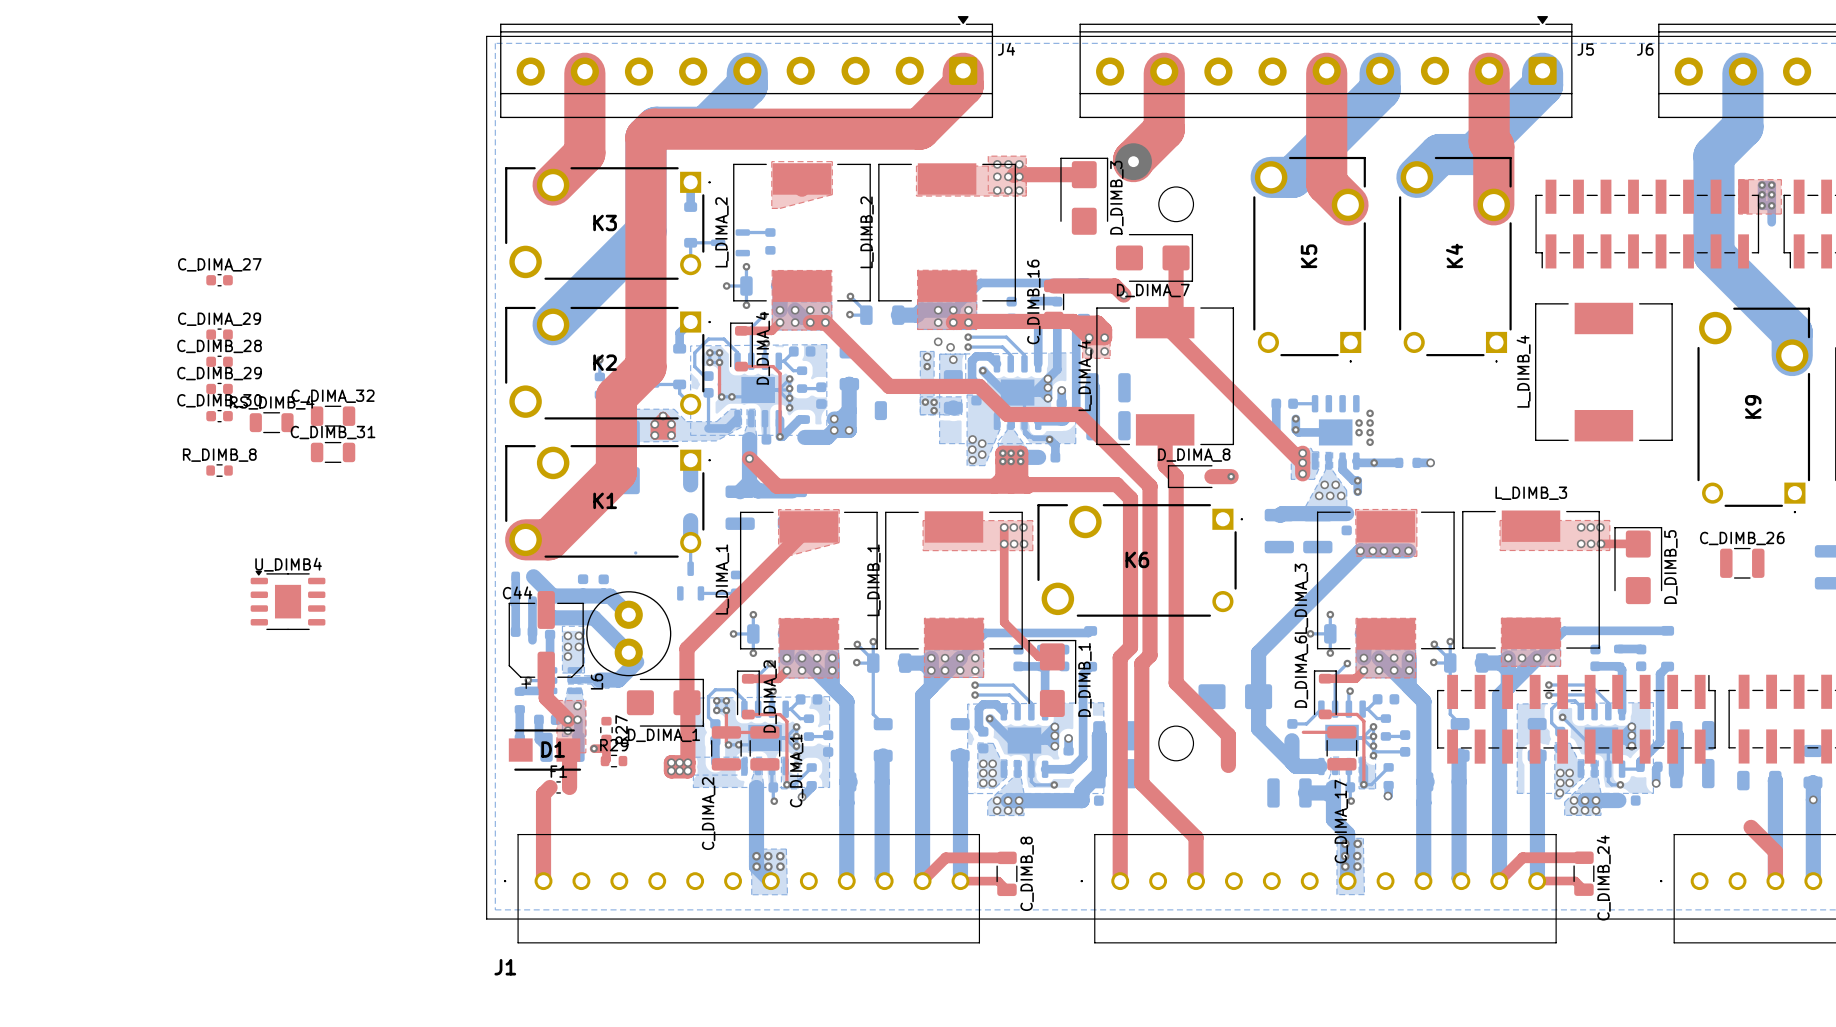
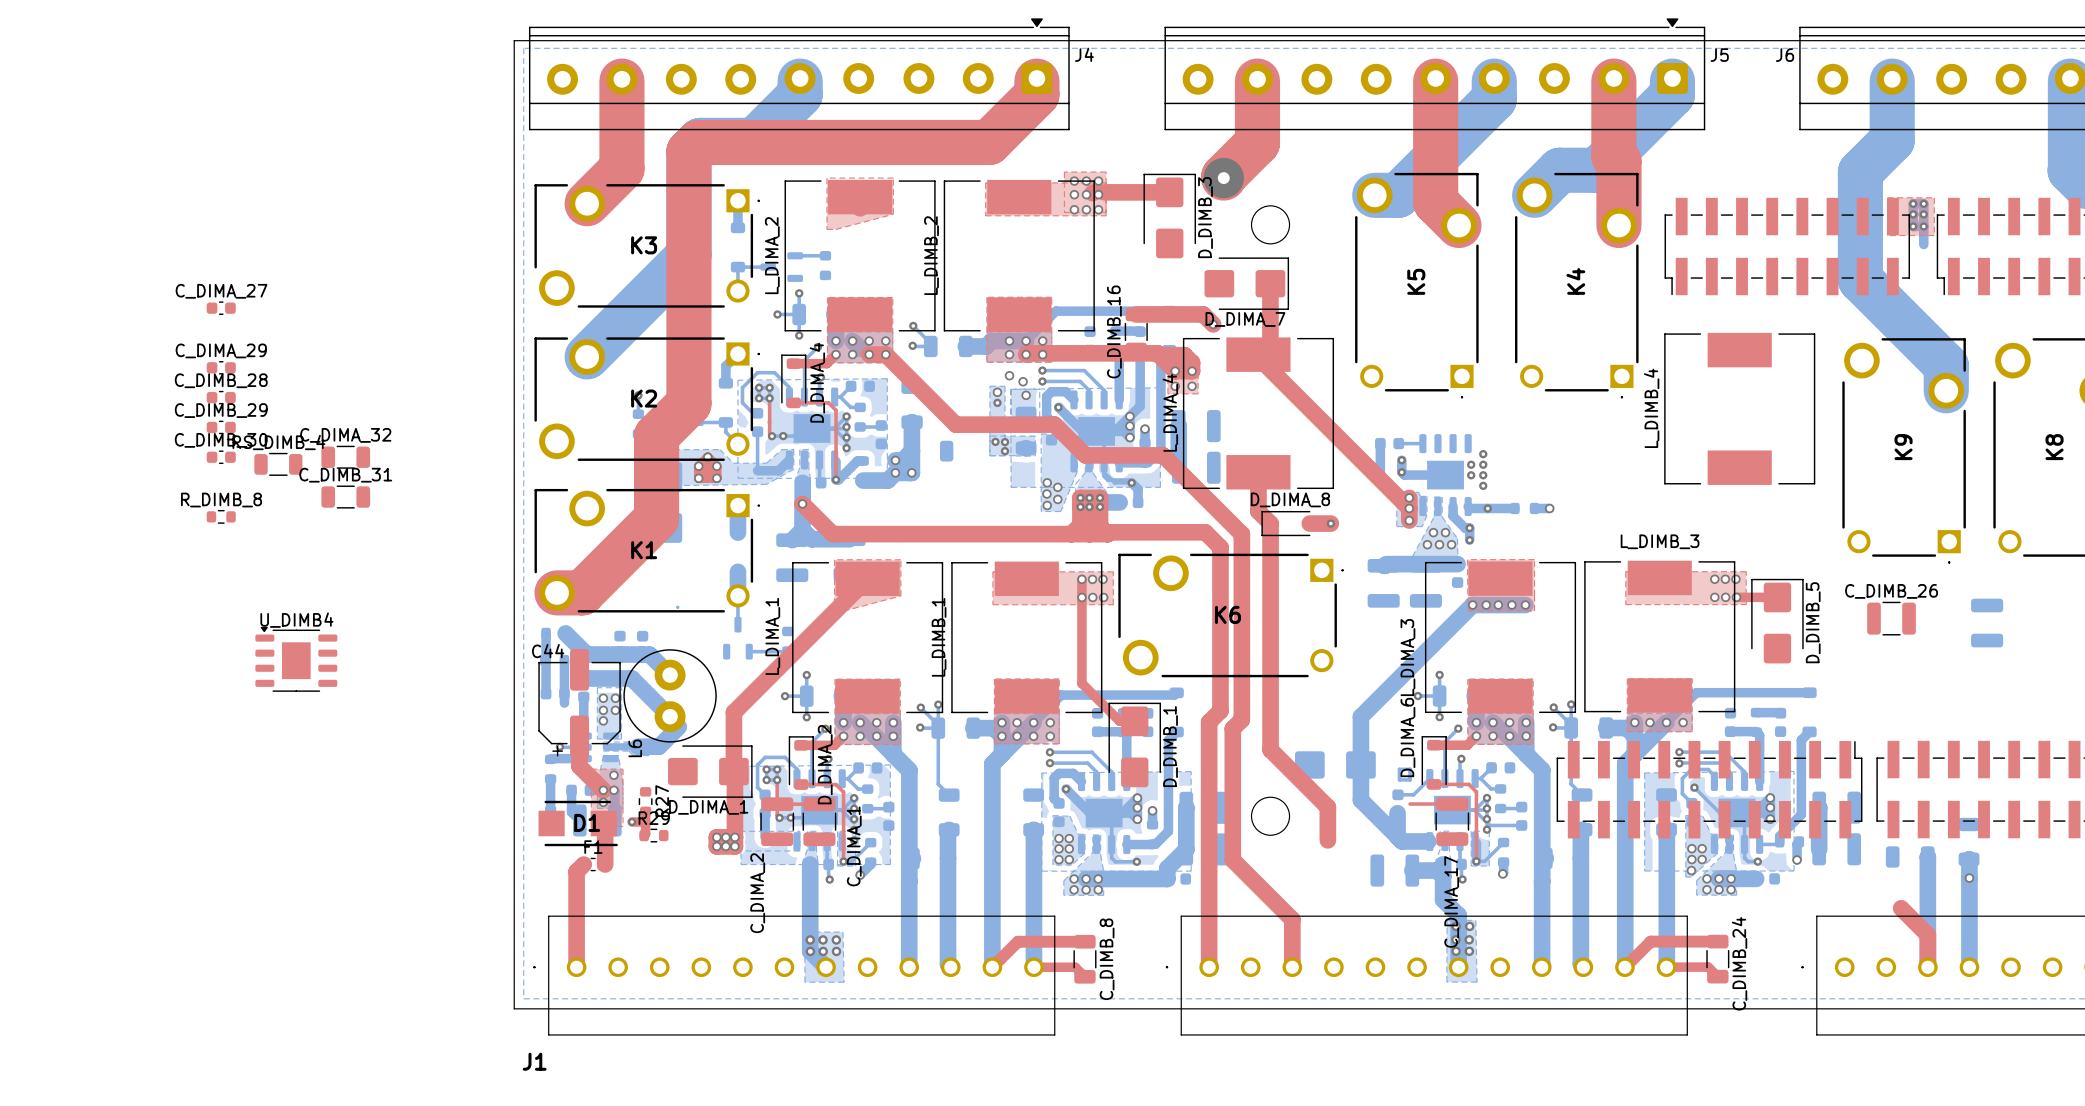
bottom track: none -> (1399, 769) (1410, 769) (1410, 779) (1399, 779) (1399, 769)

